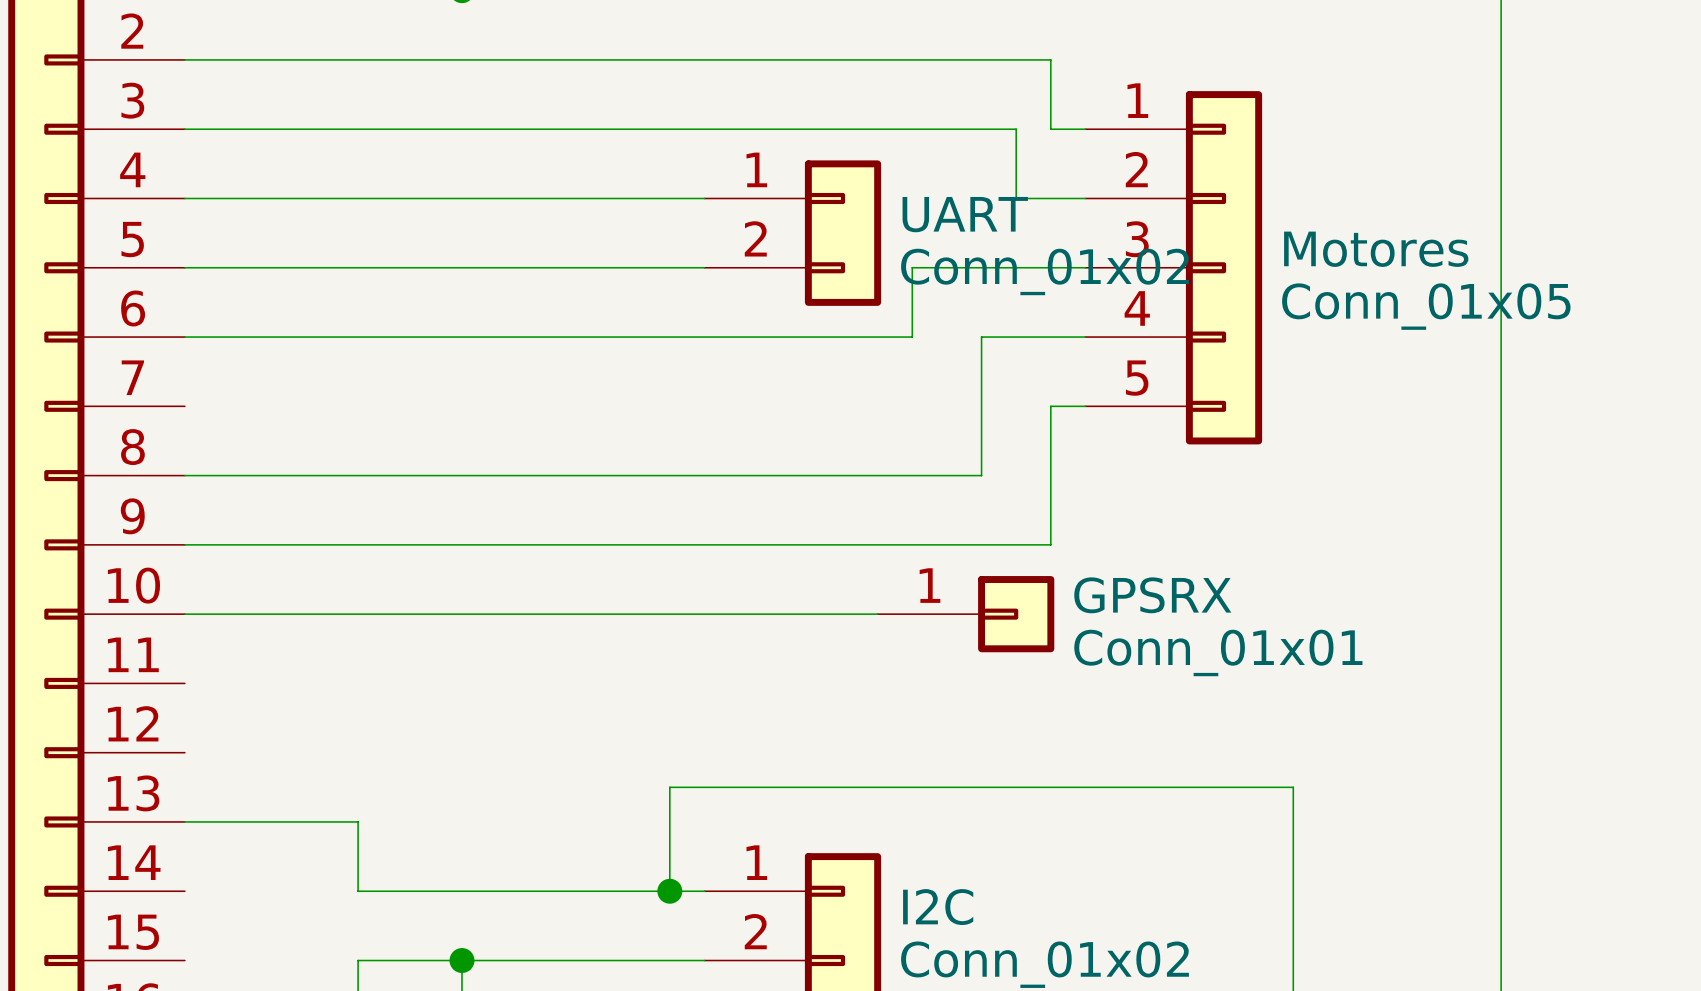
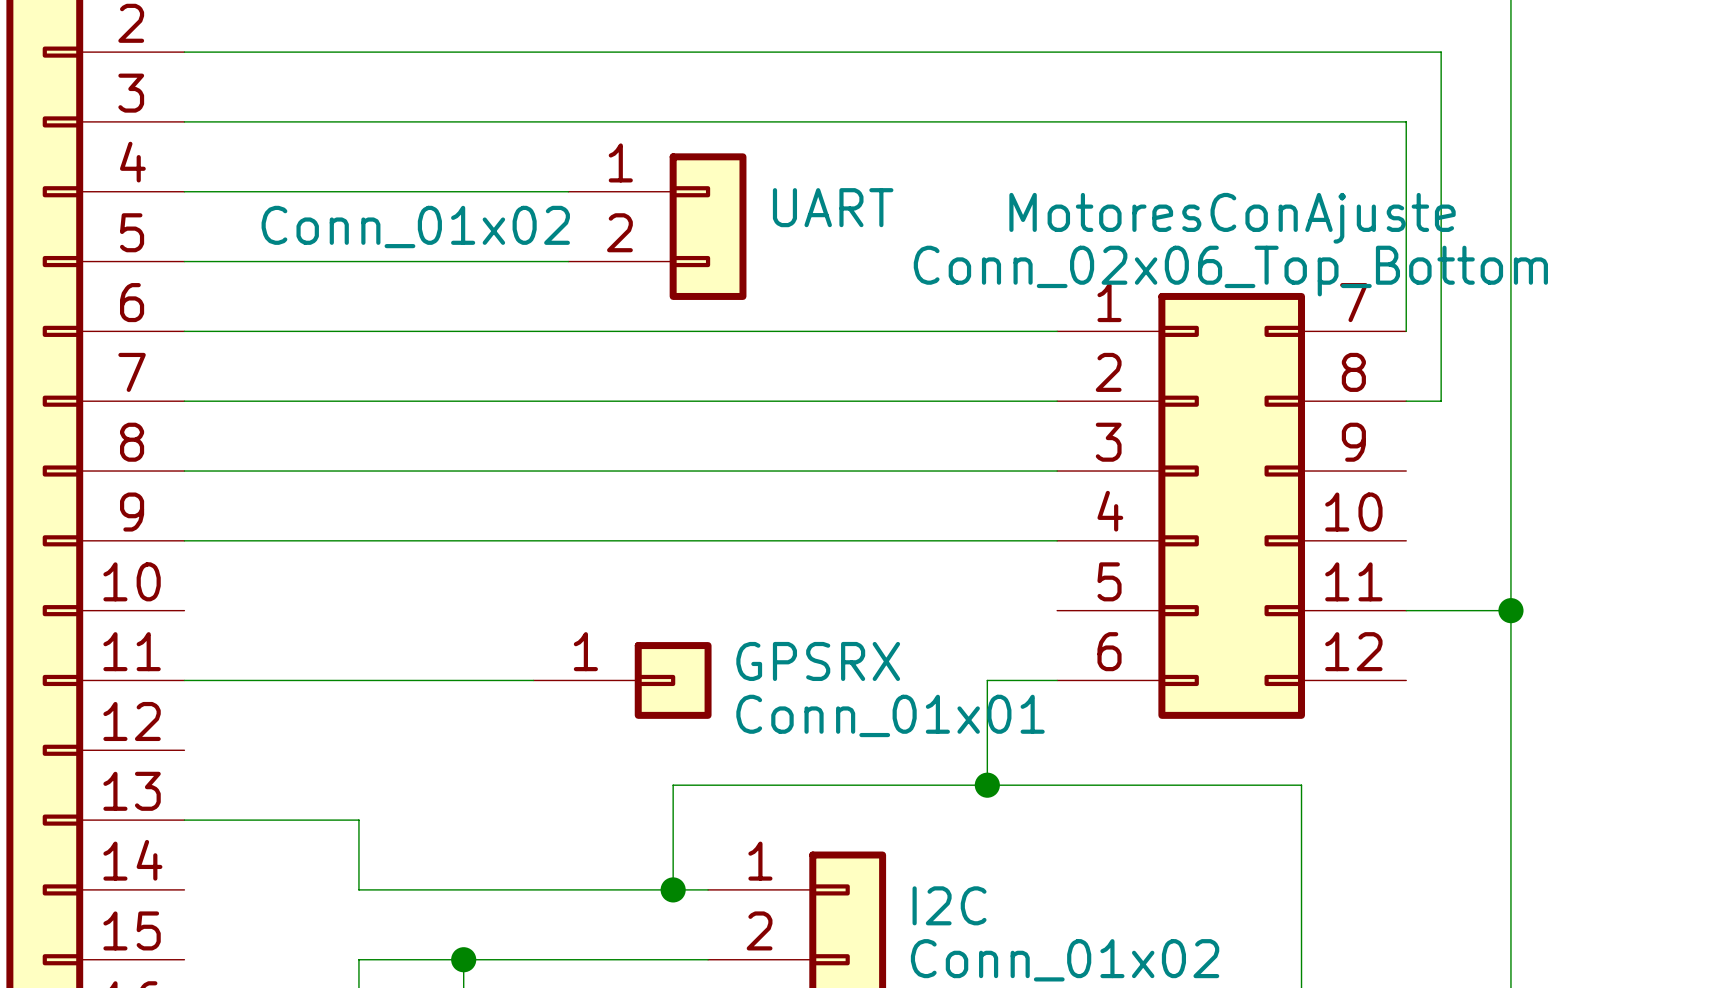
wire: (1050, 59) (1050, 129) -> (1022, 121) (1057, 121)
wire: none -> (1057, 52) (1441, 52) (1441, 401) (1406, 401)
wire: (1016, 129) (1016, 198) (1085, 198) -> none
wire: none -> (1092, 121) (1406, 121) (1406, 331)
UART position: (792, 233) -> (657, 226)
wire: (1085, 267) (912, 267) (912, 337) -> (987, 331) (917, 331)
Motores: Conn_01x05 (1173, 267) -> none
UART value position: Conn_01x02 (1045, 271) -> Conn_01x02 (415, 227)
wire: (981, 337) (981, 475) -> (1057, 471) (987, 471)
wire: none -> (184, 401) (1057, 401)
wire: (1085, 406) (1050, 406) (1050, 544) -> none
MotoresConAjuste: none -> Conn_02x06_Top_Bottom (1231, 505)
wire: (184, 614) (877, 614) -> none
GPSRX position: (965, 614) -> (622, 680)
wire: none -> (1406, 610) (1510, 610)
junction: none -> (1510, 610)
wire: none -> (184, 680) (533, 680)
wire: none -> (1057, 680) (987, 680) (987, 785)
junction: none -> (987, 785)

